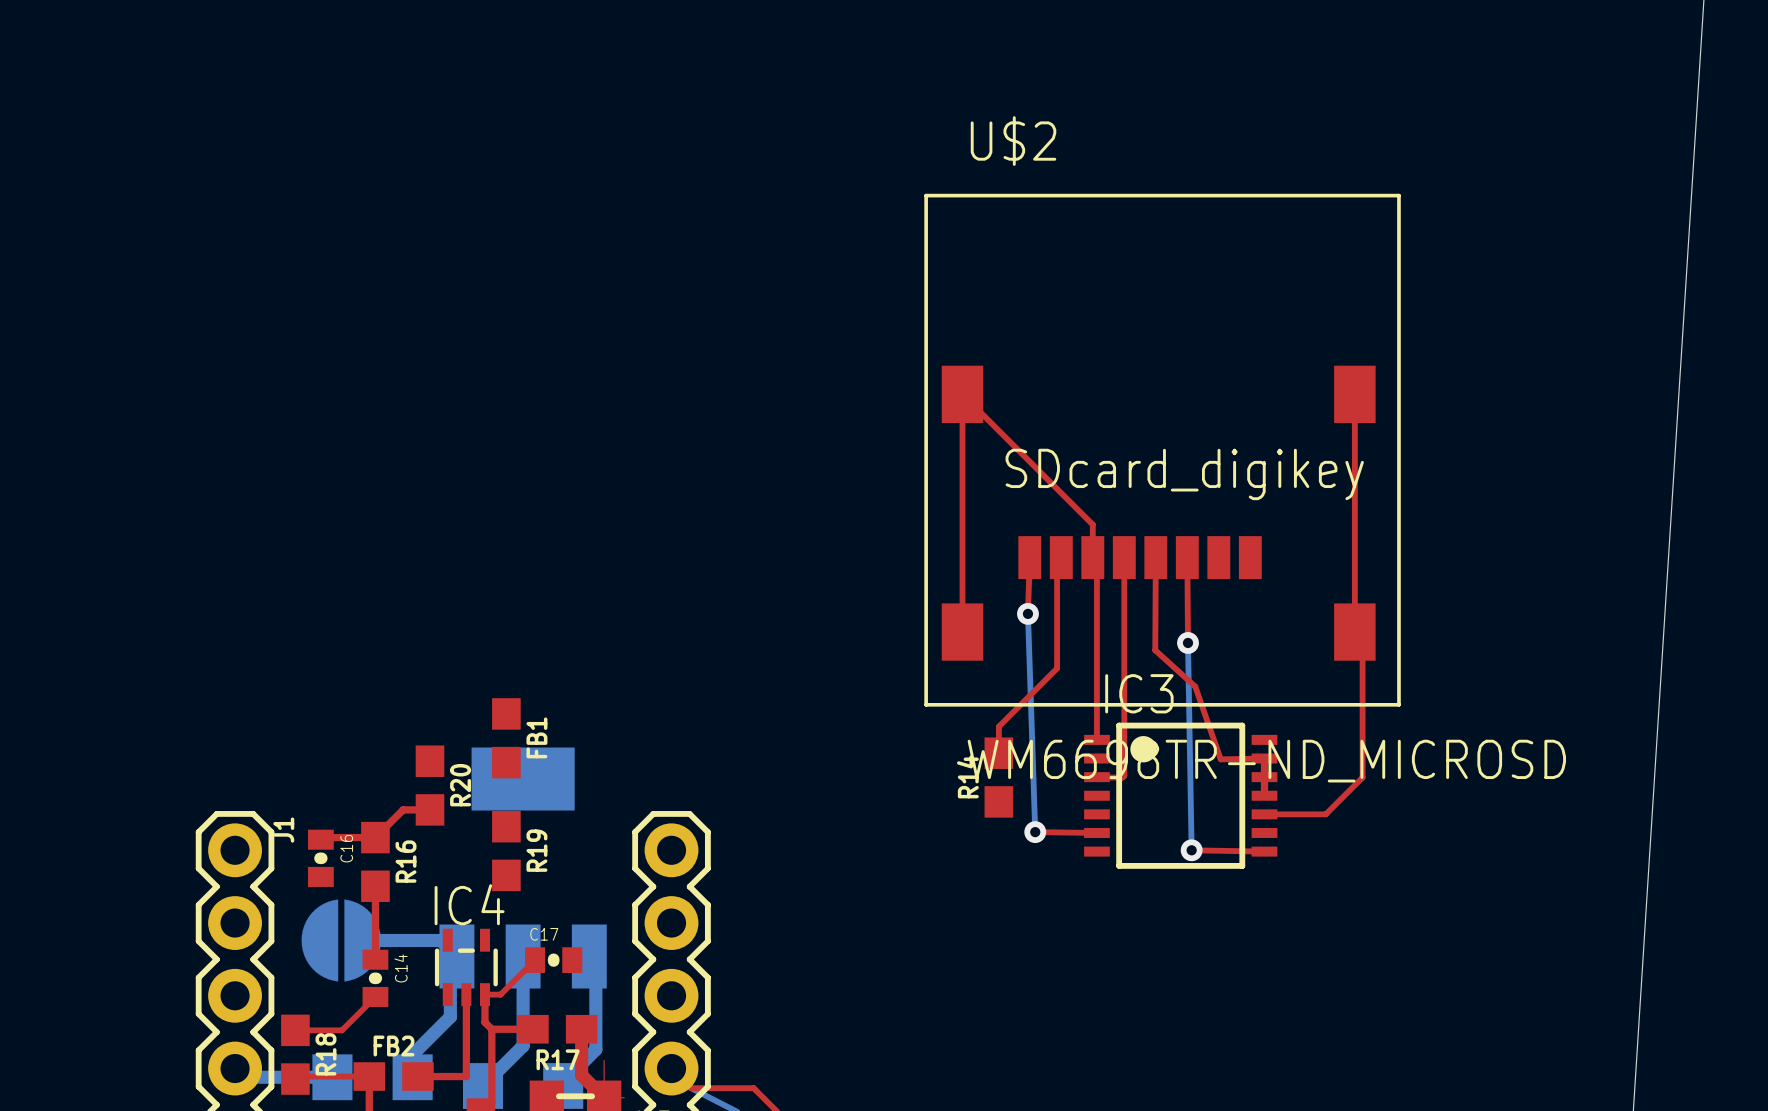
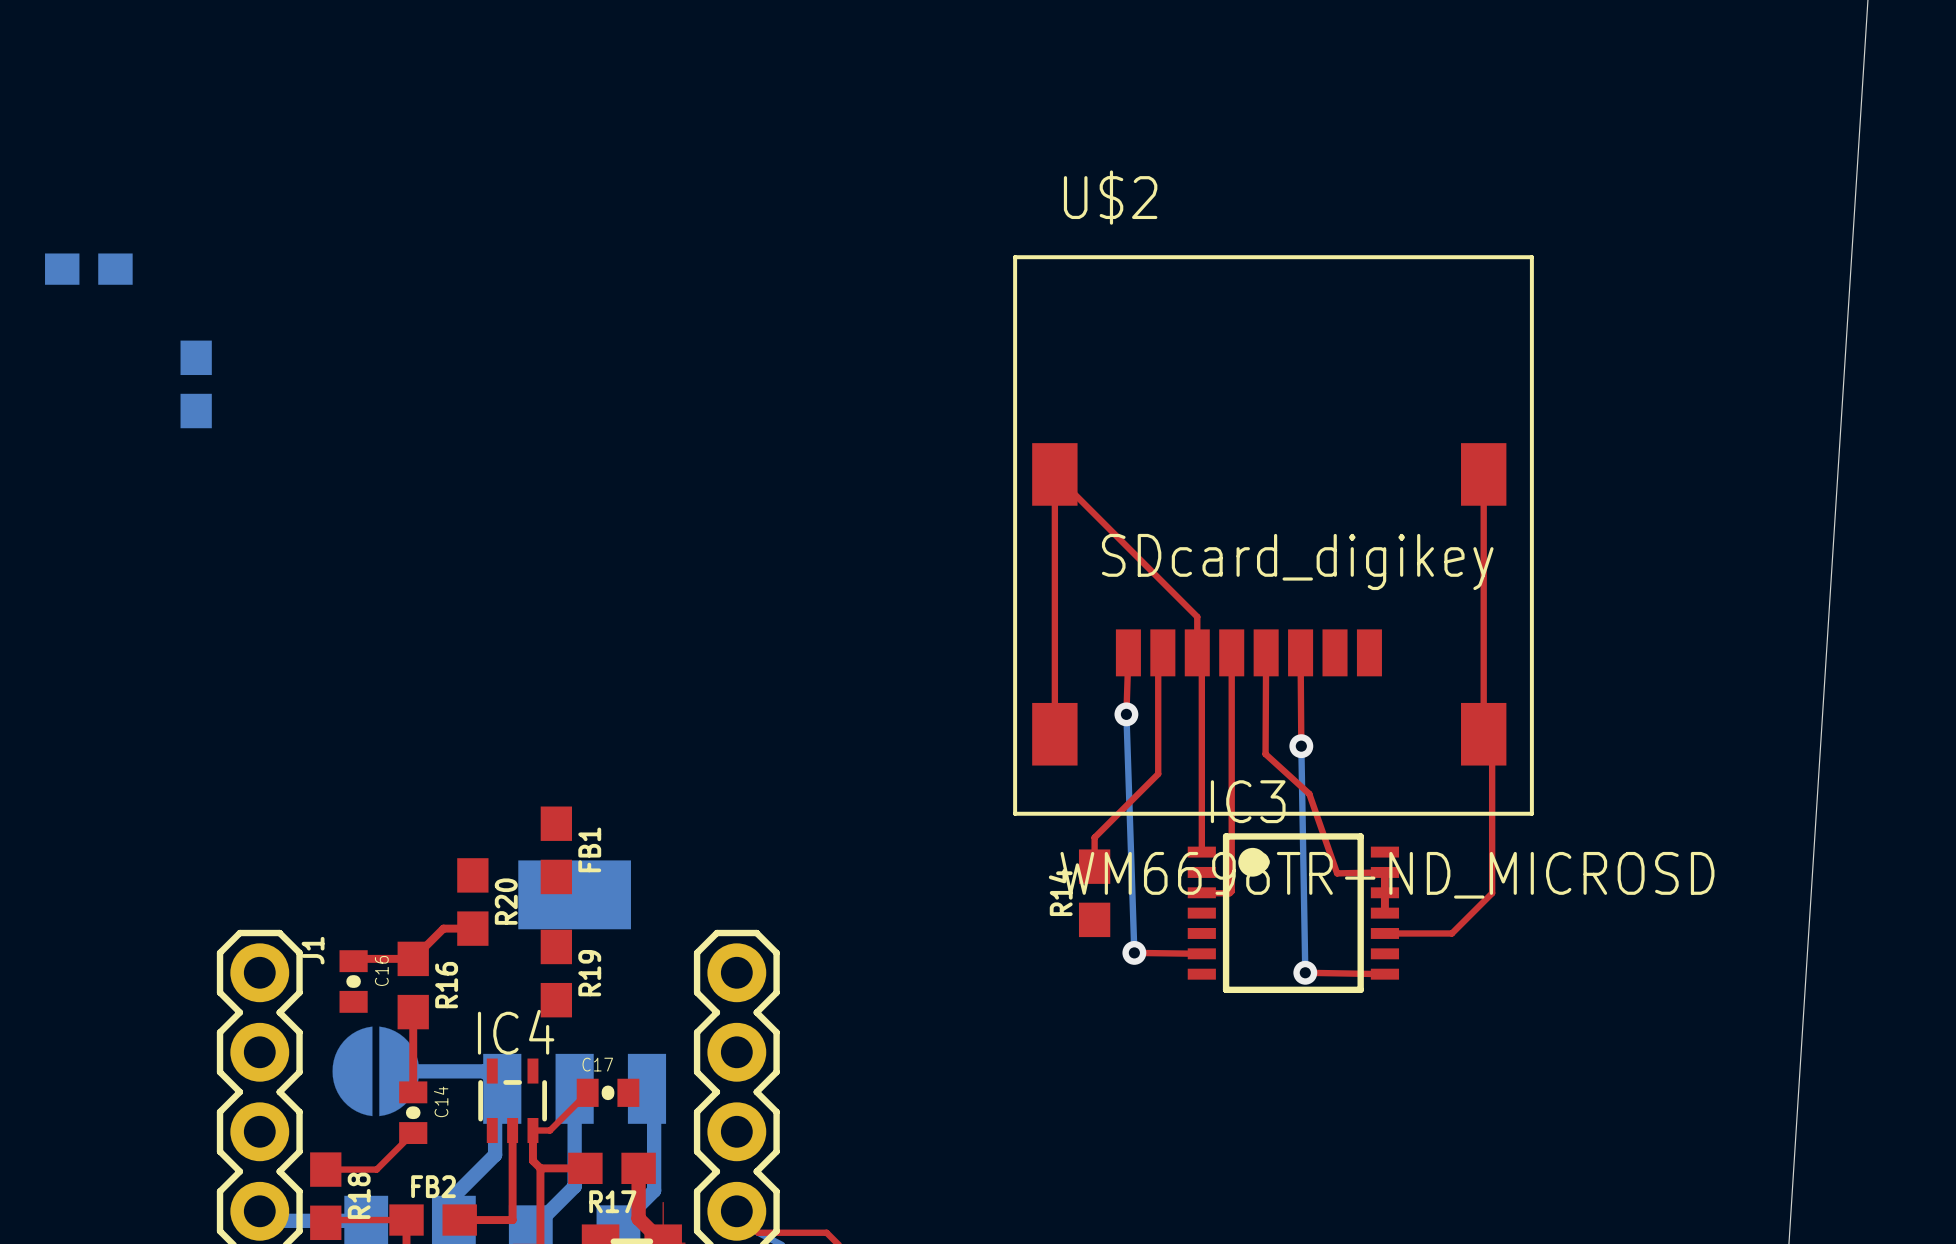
part: none -> (88, 269)
part: none -> (196, 384)

